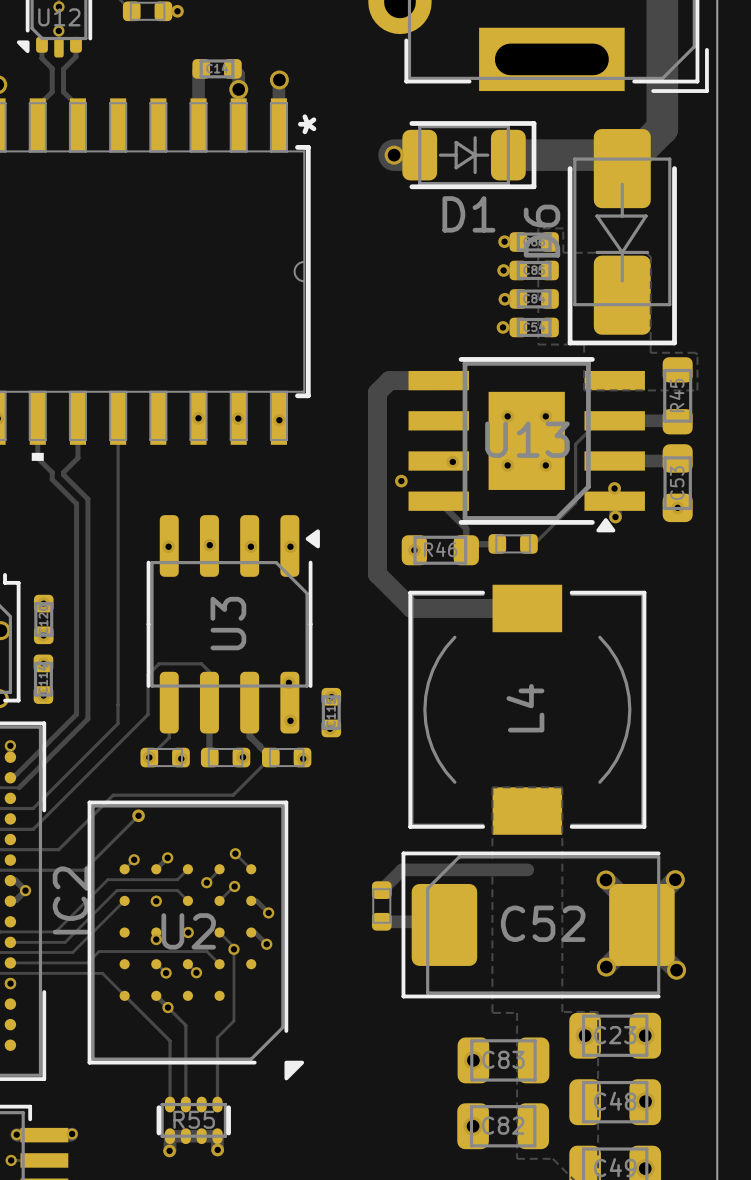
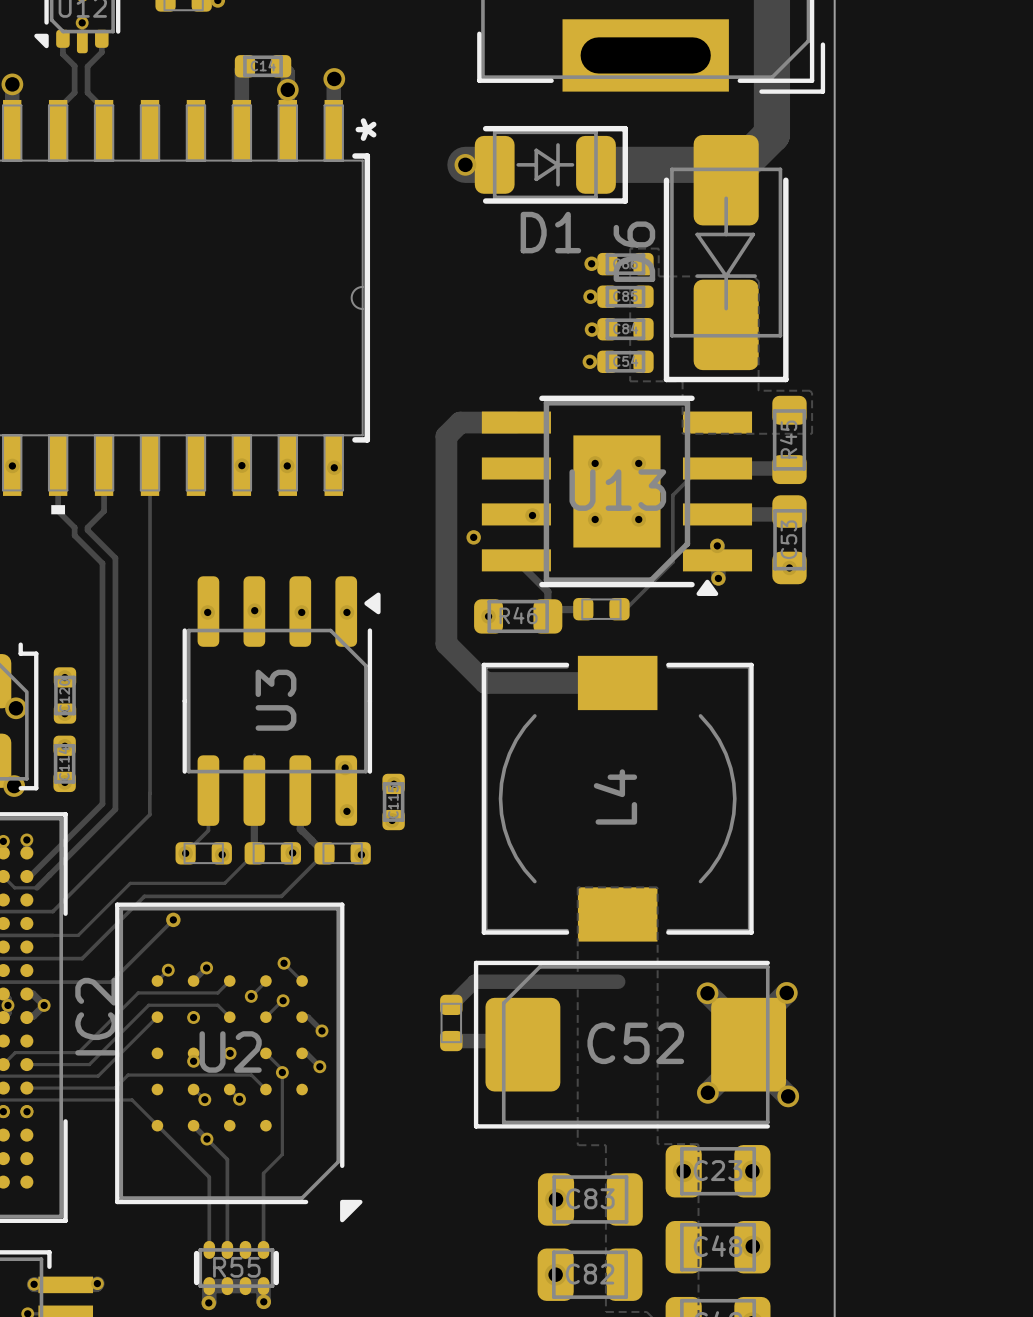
track: (209, 671) (201, 663) (159, 663) (148, 674) (148, 714) (33, 829) -> (254, 853) (224, 883) (130, 883) (78, 935) (52, 935)

